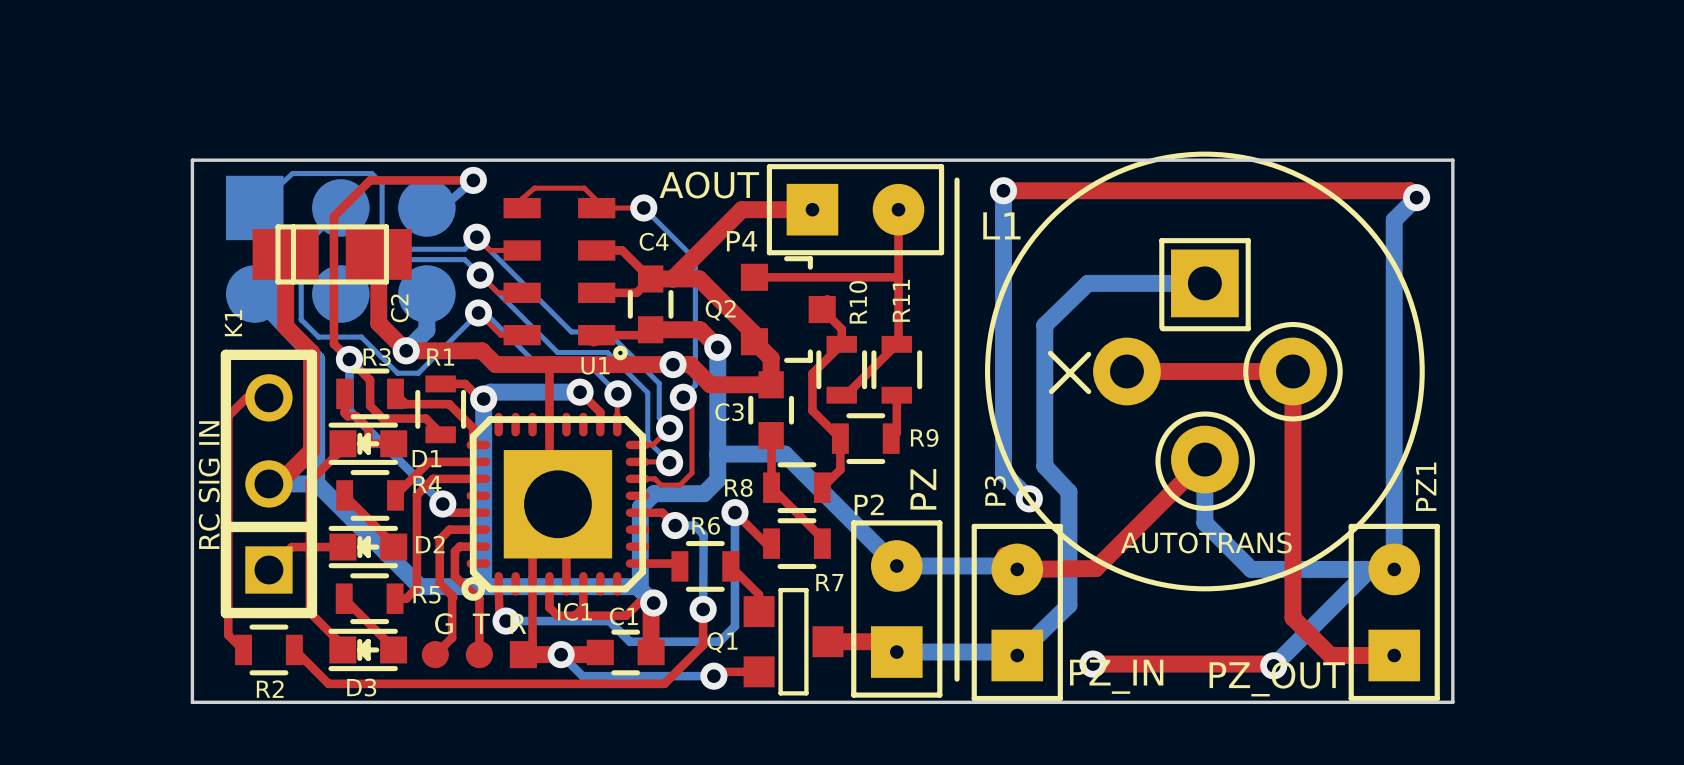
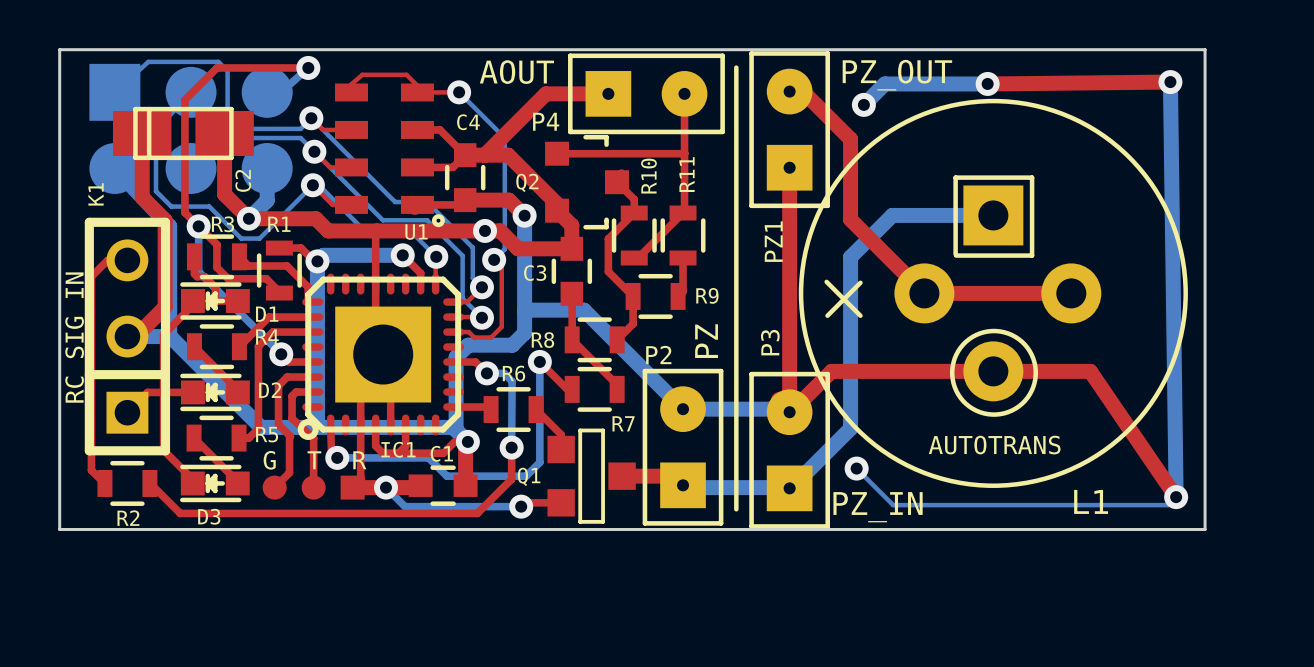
board edge: (192, 160) (1452, 160) (1452, 702) (192, 702) -> (59, 49) (1205, 49) (1205, 529) (59, 529)
top track: (1003, 190) (1409, 190) (1416, 197) -> none
bottom track: (1003, 190) (1003, 473) (1029, 498) -> none
via position: (1003, 190) -> (863, 104)
top track: none -> (1170, 82) (987, 83)
bottom track: none -> (1170, 82) (1176, 497) (1168, 505) (893, 505) (856, 468)
bottom track: (1416, 197) (1394, 220) (1394, 569) (1251, 569) (1204, 522) (1204, 459) -> none
via position: (1416, 197) -> (1170, 82)
bottom track: none -> (987, 83) (884, 83) (863, 104)
via: none -> (987, 83)
top track: none -> (789, 91) (802, 91) (850, 139) (850, 219) (924, 293) (1071, 293)
L1 name position: L1 (1001, 225) -> L1 (1091, 501)
bottom track: (1204, 283) (1087, 283) (1044, 325) (1044, 466) (1068, 491) (1068, 605) (1017, 655) (1013, 652) (896, 652) -> none
top track: none -> (789, 167) (789, 409) (791, 411) (831, 371) (1090, 371) (1176, 497)
drawing: [1243, 321, 1343, 422] -> none
line: (1161, 327) (1161, 240) (1248, 240) (1248, 328) (1162, 328) -> (955, 254) (955, 177) (1032, 177) (1032, 255) (956, 255)
bottom track: none -> (993, 215) (892, 215) (850, 257) (850, 428) (791, 487) (685, 487)
line: (1050, 353) (1088, 391) -> (826, 281) (860, 315)
line: (1088, 354) (1051, 391) -> (860, 282) (827, 315)
top track: (1126, 371) (1292, 371) (1292, 617) (1330, 655) (1394, 655) -> none
L1 position: (1204, 371) -> (993, 293)
top track: (1204, 459) (1095, 568) (1017, 569) -> none
drawing position: (1205, 461) -> (993, 372)
PZ1 name position: PZ1 (1426, 486) -> PZ1 (773, 241)
via: (1029, 498) -> none
bottom track: (1370, 569) (1273, 665) -> none
PZ1 position: (1394, 612) -> (789, 129)
top track: (1093, 664) (1272, 664) (1273, 665) -> none
via position: (1093, 664) -> (856, 468)
via: (1273, 665) -> none
via: none -> (1176, 497)
PZ1 value position: PZ_OUT (1277, 679) -> PZ_OUT (897, 75)

